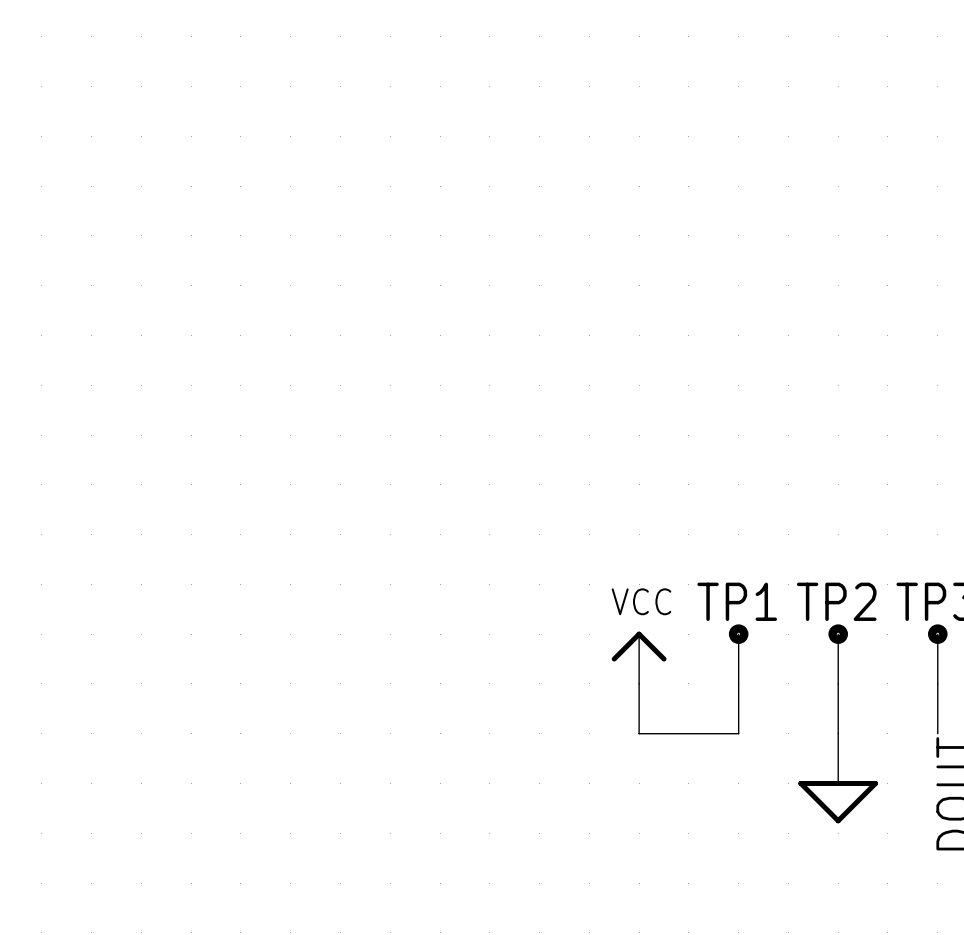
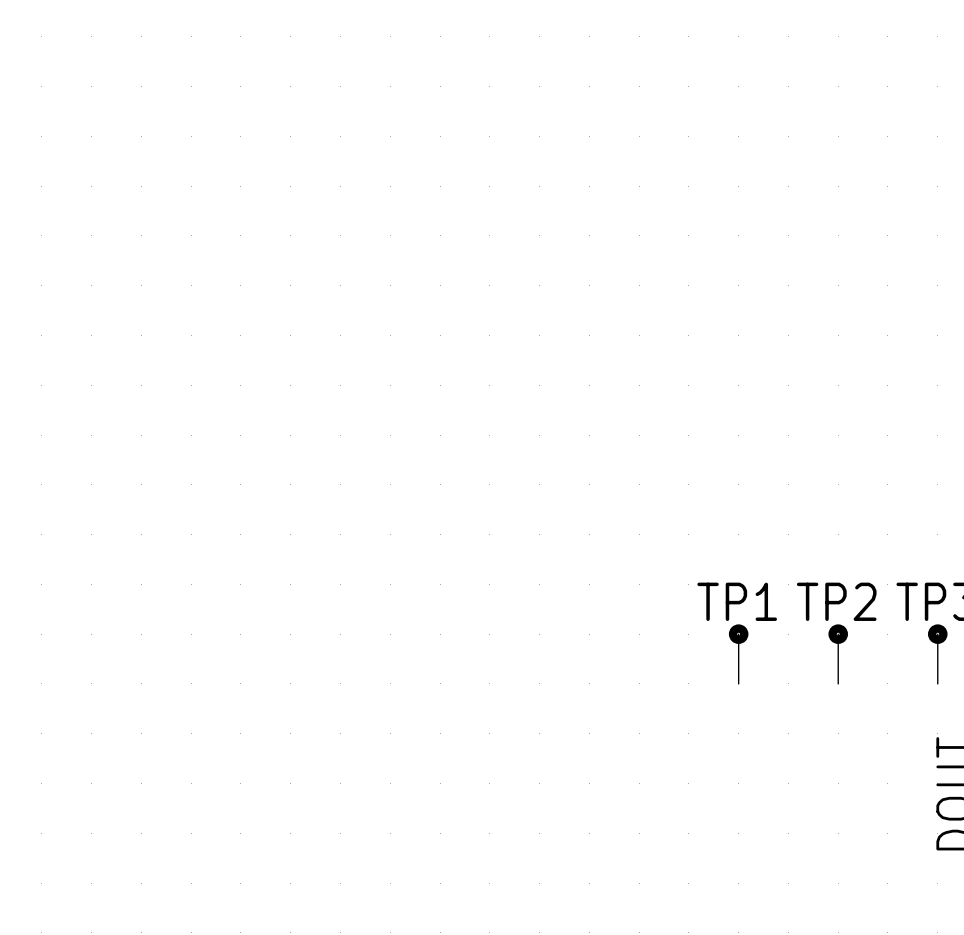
power symbol: VCC (639, 657) -> none
wire: (639, 683) (639, 733) (738, 733) (738, 683) -> none
wire: (838, 683) (838, 733) -> none
wire: (937, 683) (937, 733) -> none
power symbol: (838, 778) -> none

